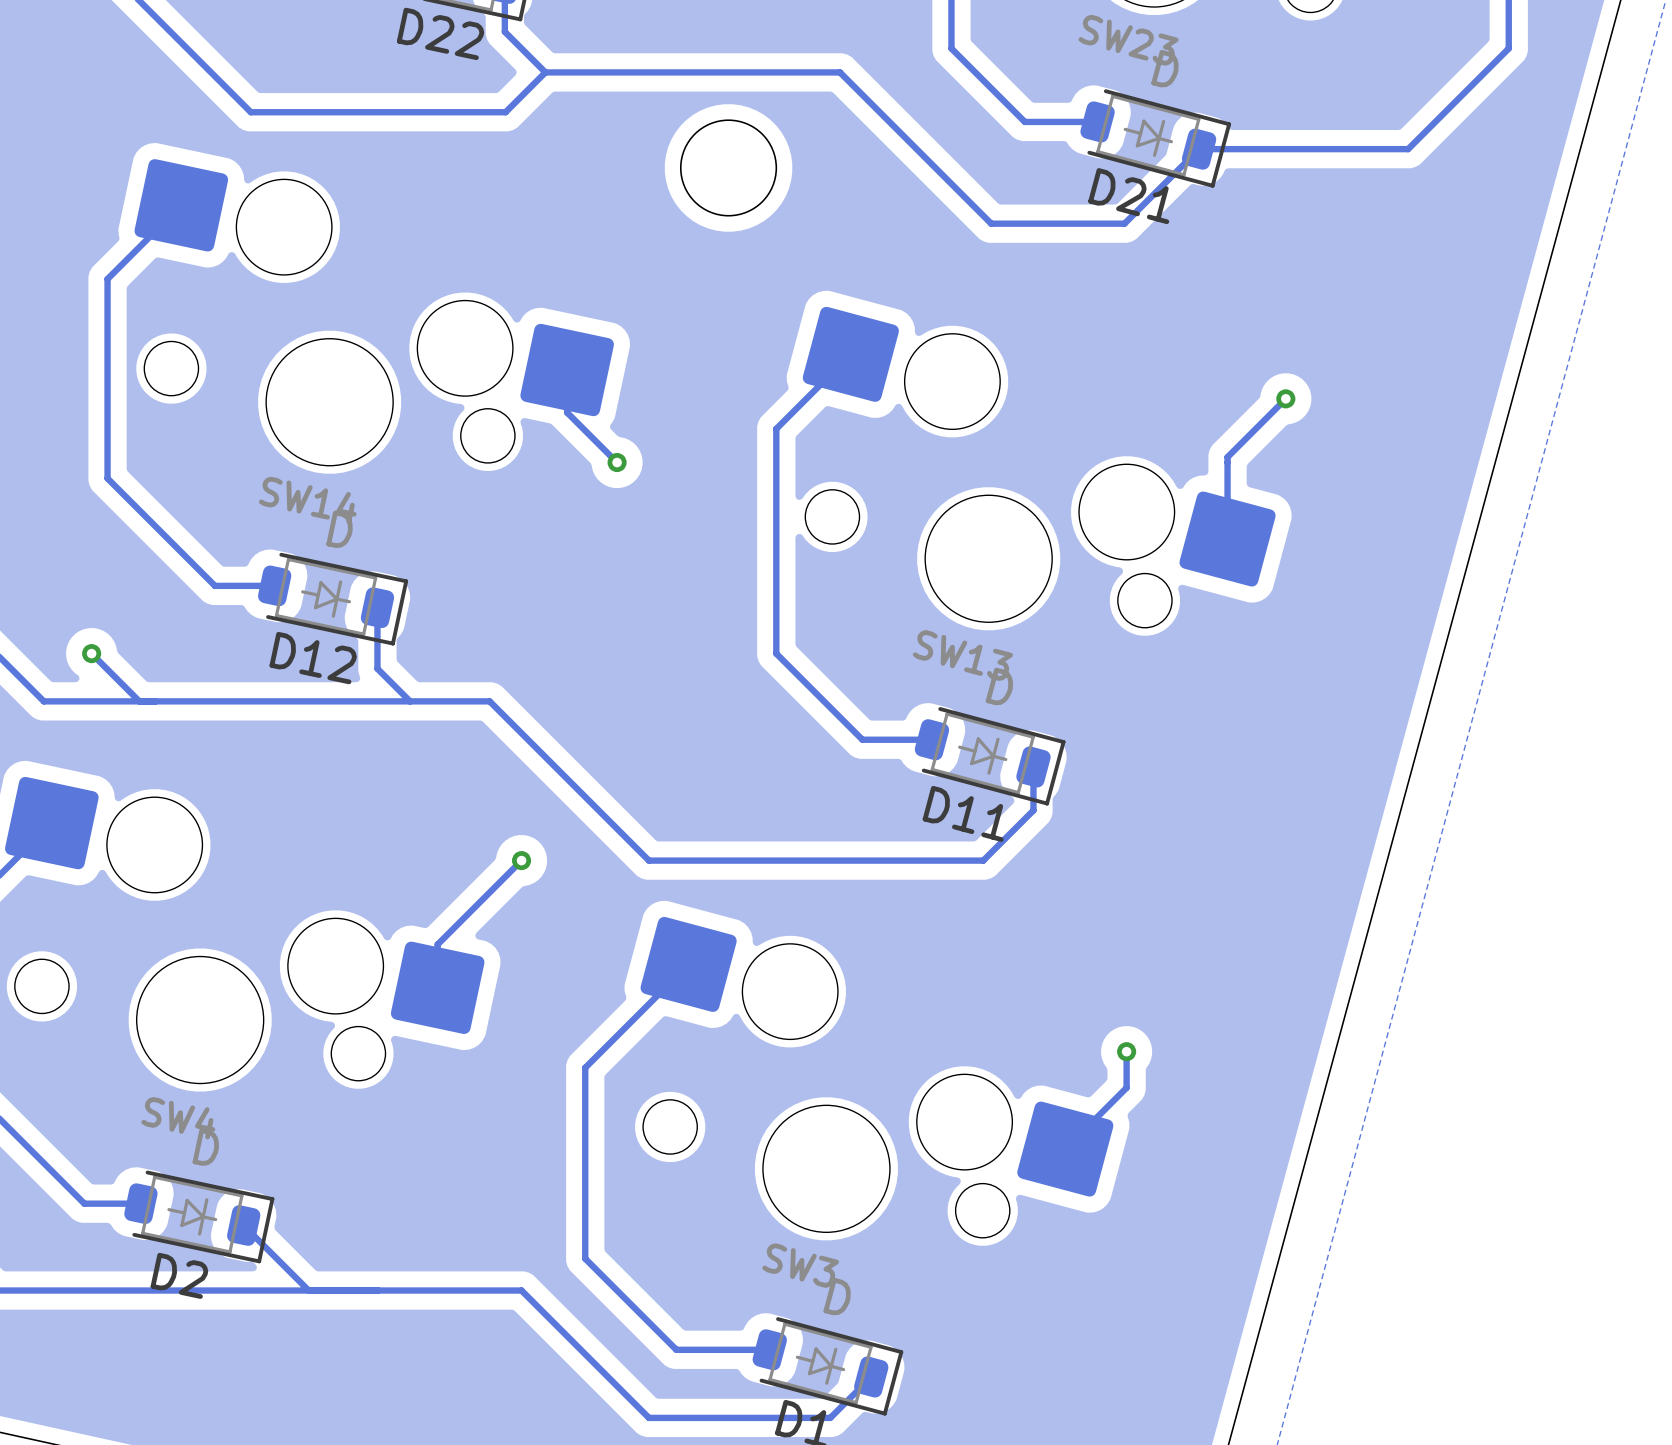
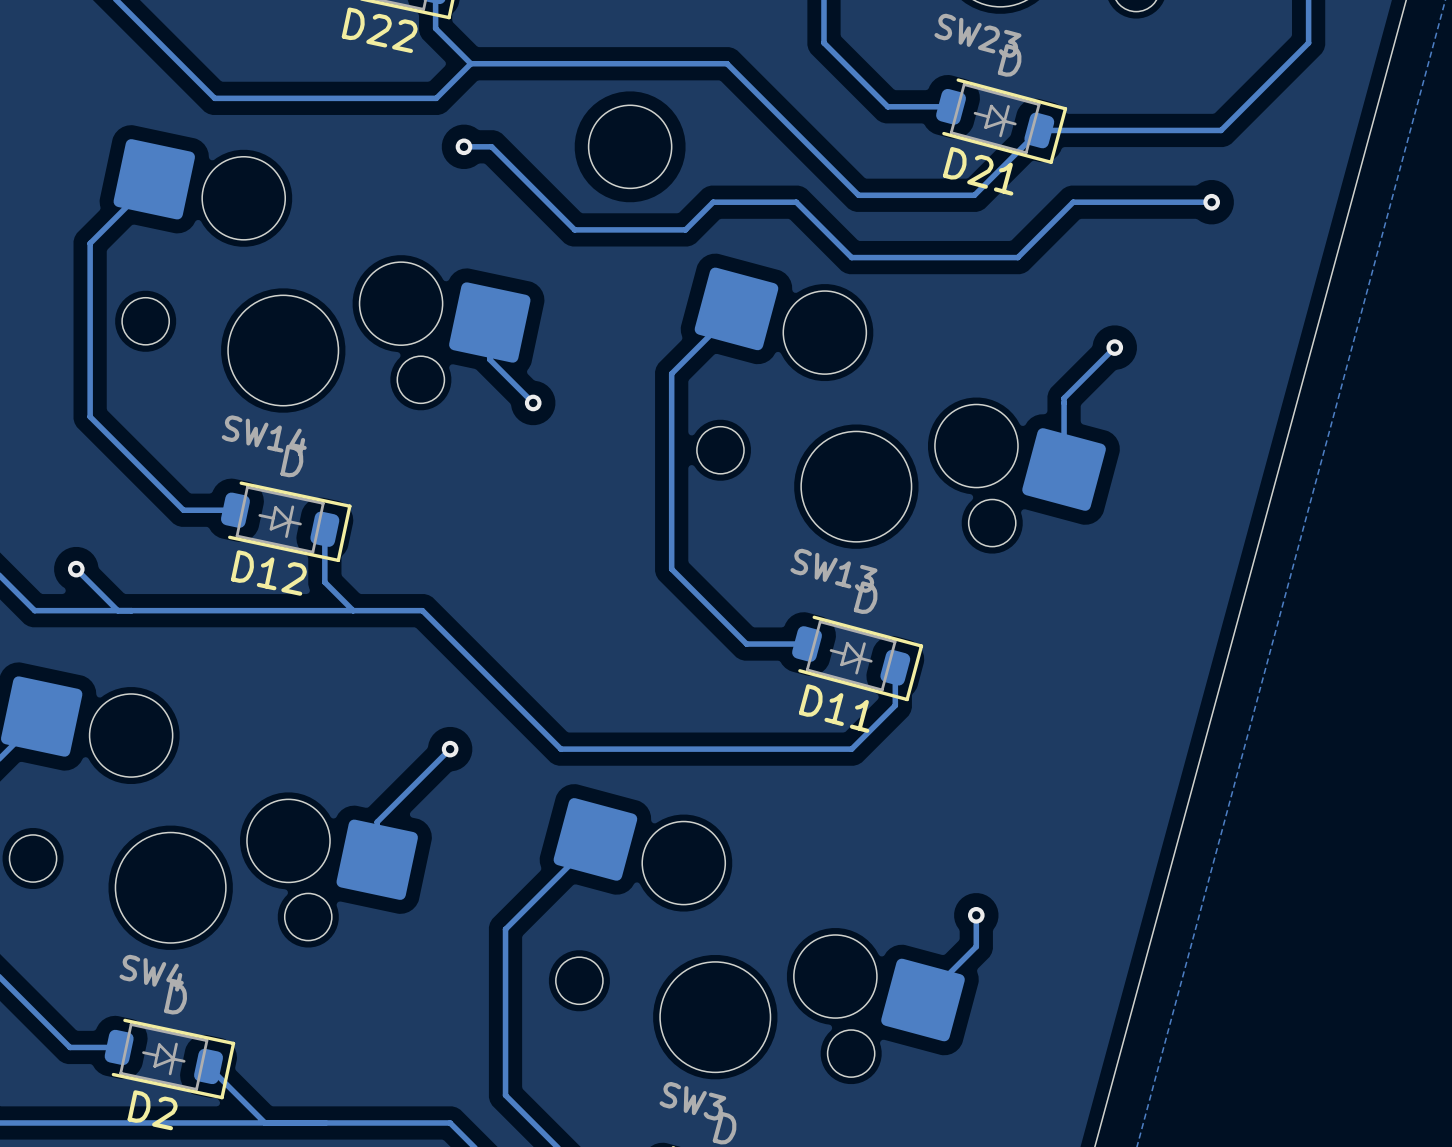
track: none -> (463, 146) (491, 146) (574, 229) (685, 229) (713, 202) (796, 202) (851, 257) (1017, 257) (1073, 202) (1211, 202)
via: none -> (463, 146)
via: none -> (1211, 202)

